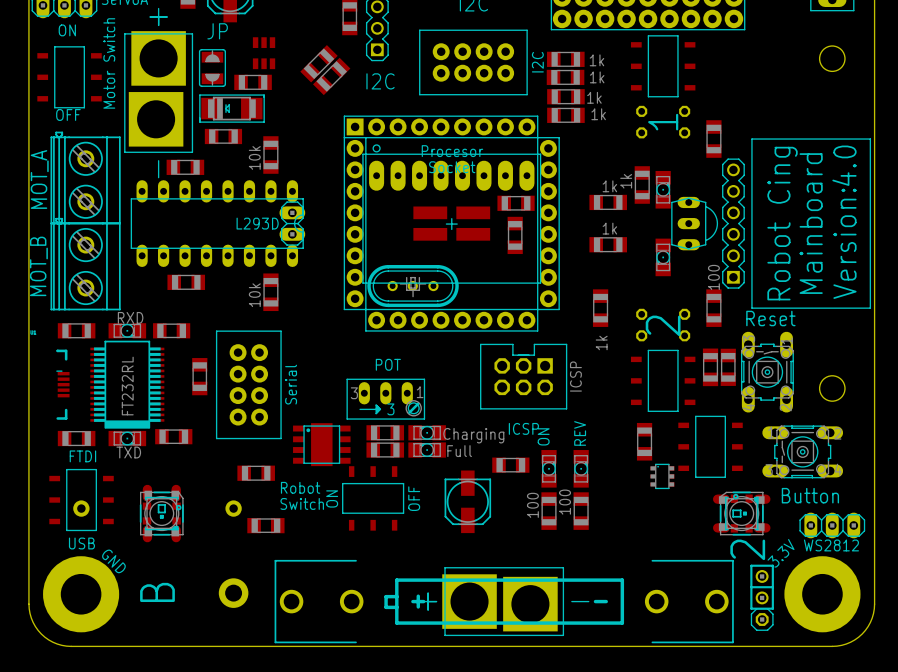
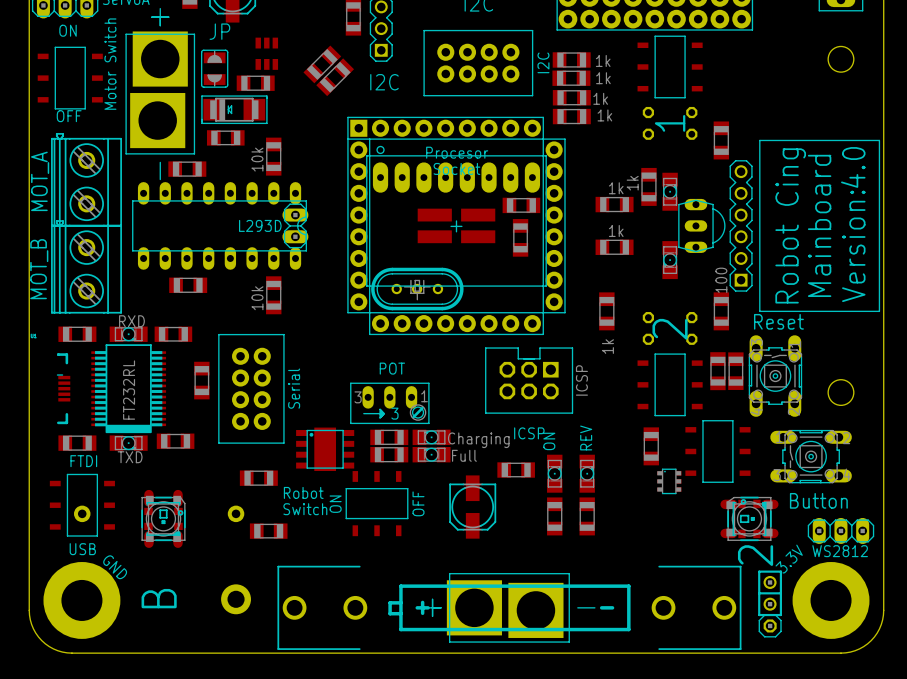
part value: 100 (565, 502) -> none
part value: 100 (532, 505) -> none

